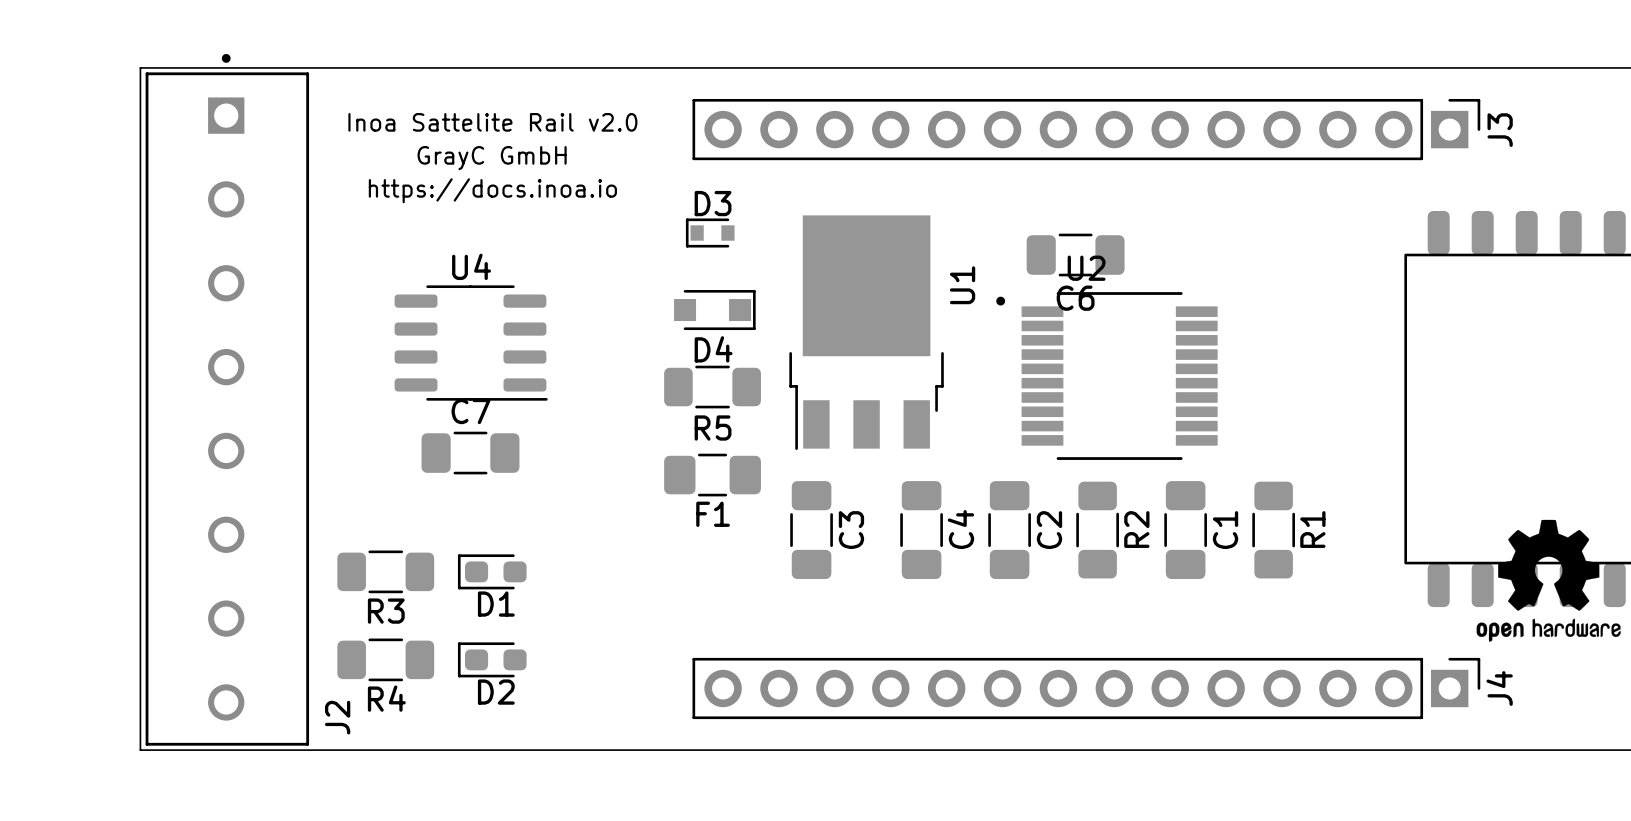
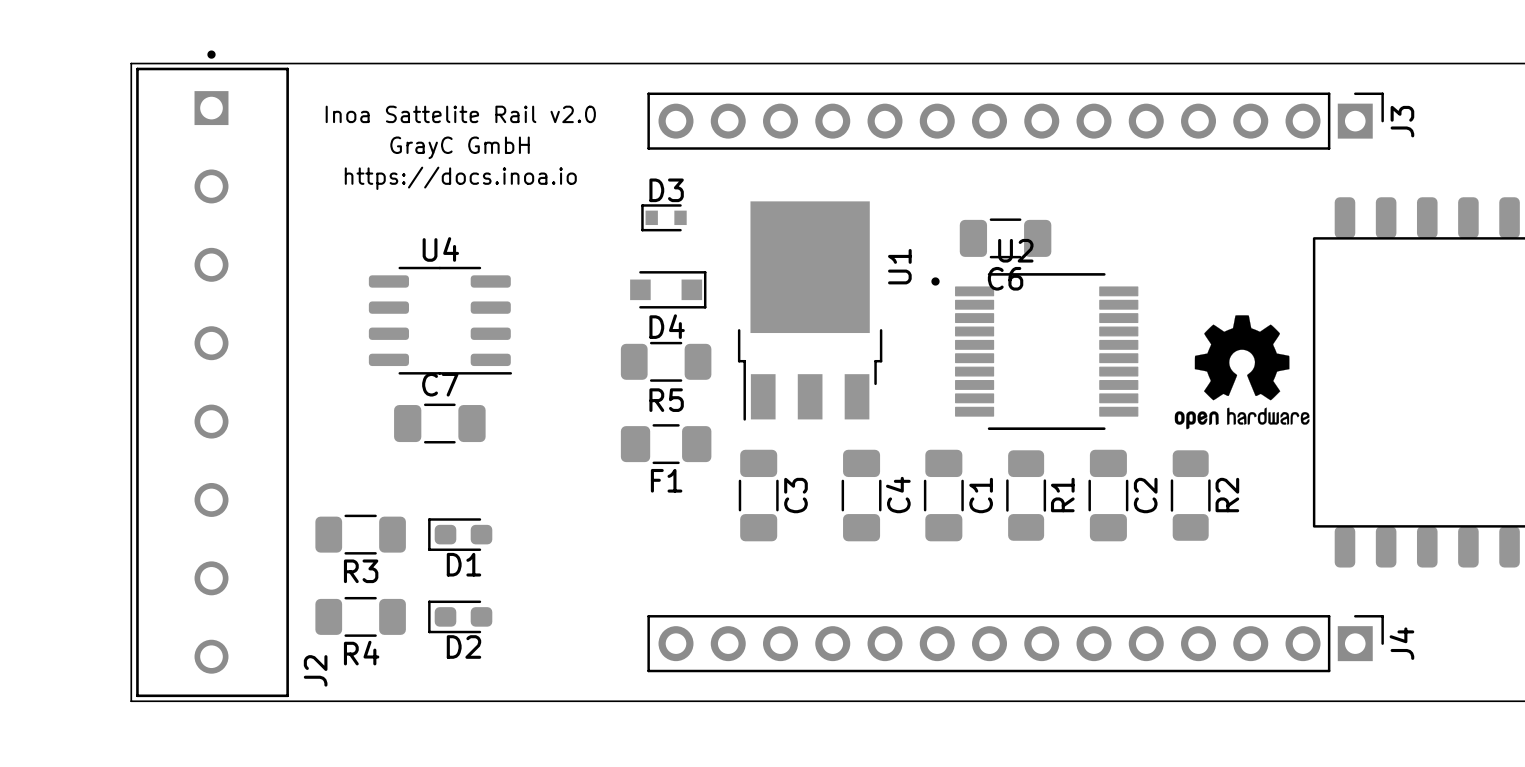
R2 name: R2 (1136, 529) -> R1 (1062, 495)
R1 name: R1 (1312, 529) -> R2 (1227, 495)
C2 name: C2 (1049, 530) -> C1 (981, 495)
C1 name: C1 (1225, 530) -> C2 (1145, 495)
drawing position: (1548, 580) -> (1242, 372)

